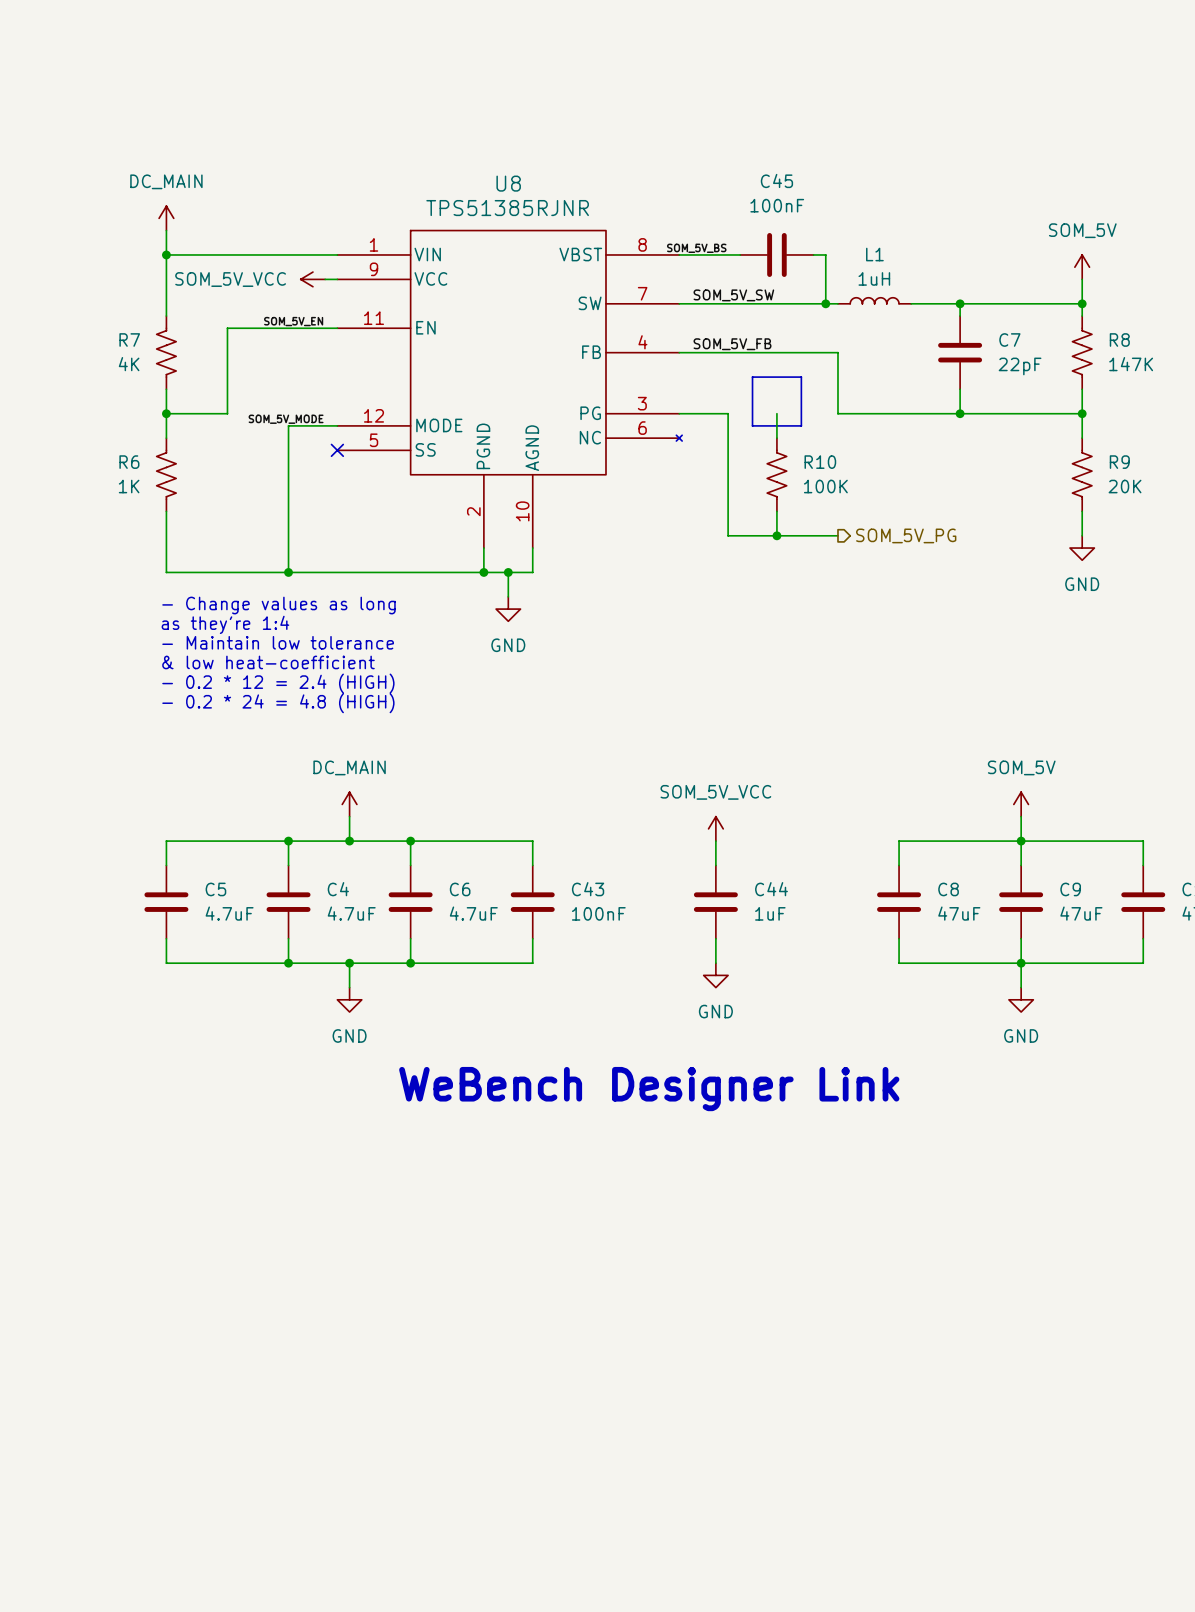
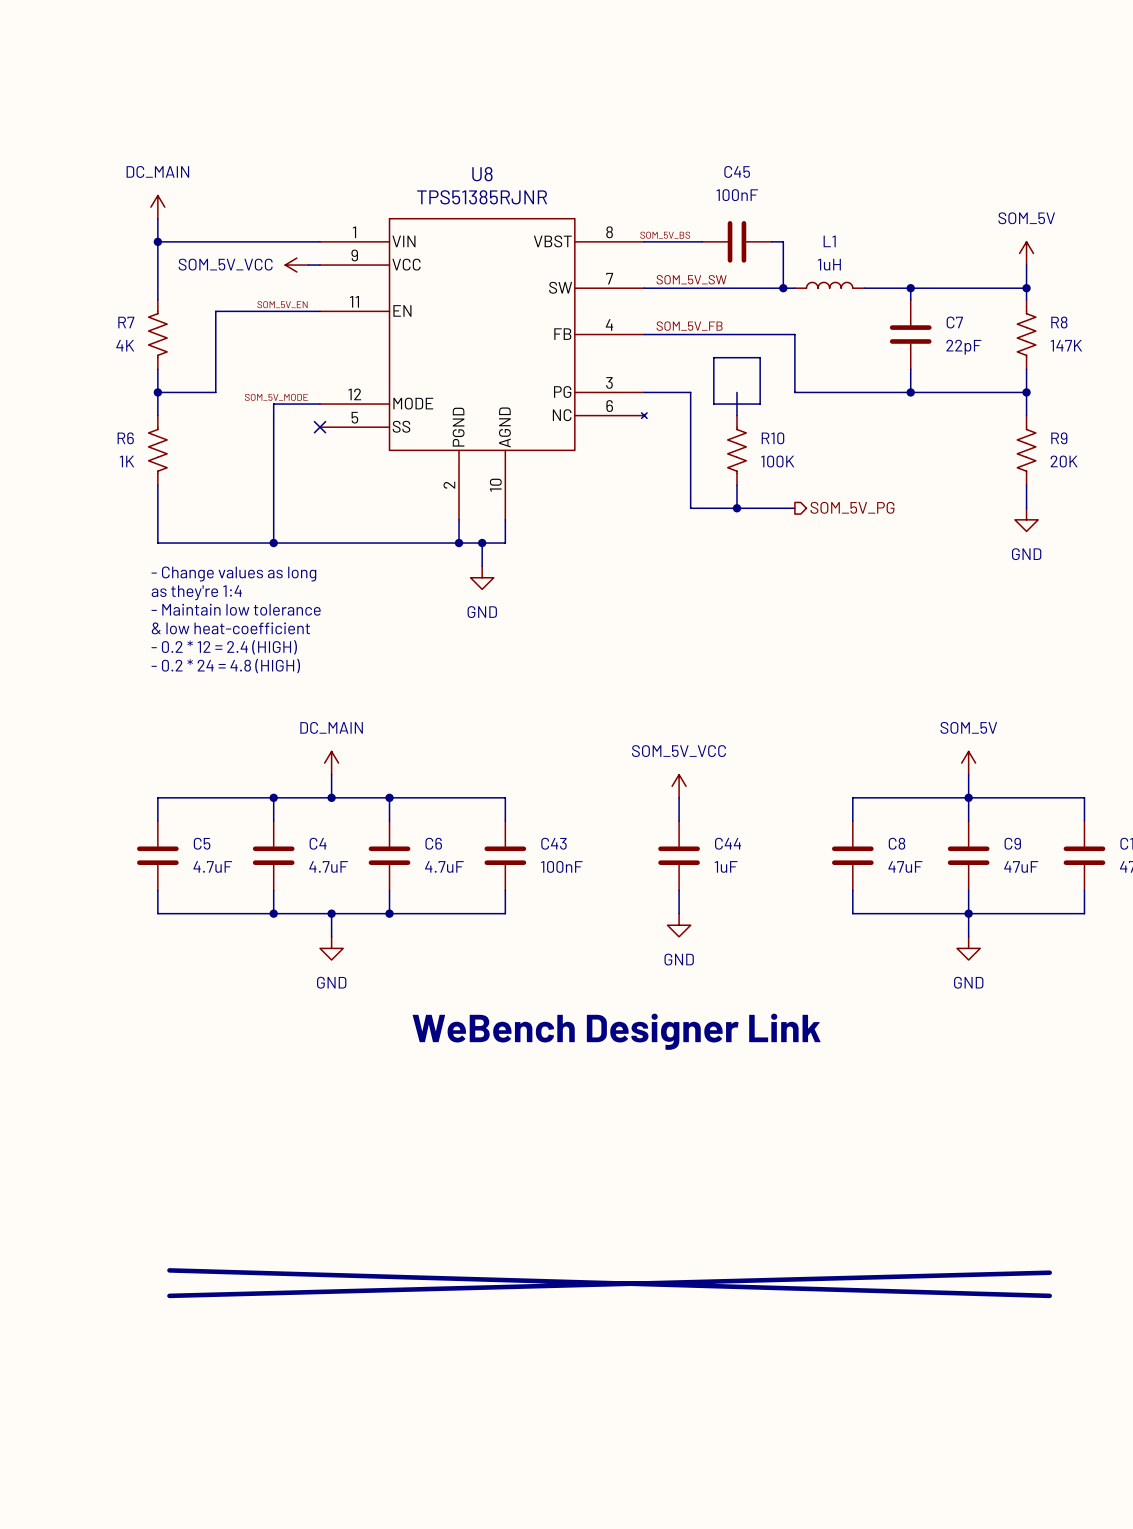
line: none -> (169, 1270) (1049, 1295)
line: none -> (1049, 1272) (169, 1295)

